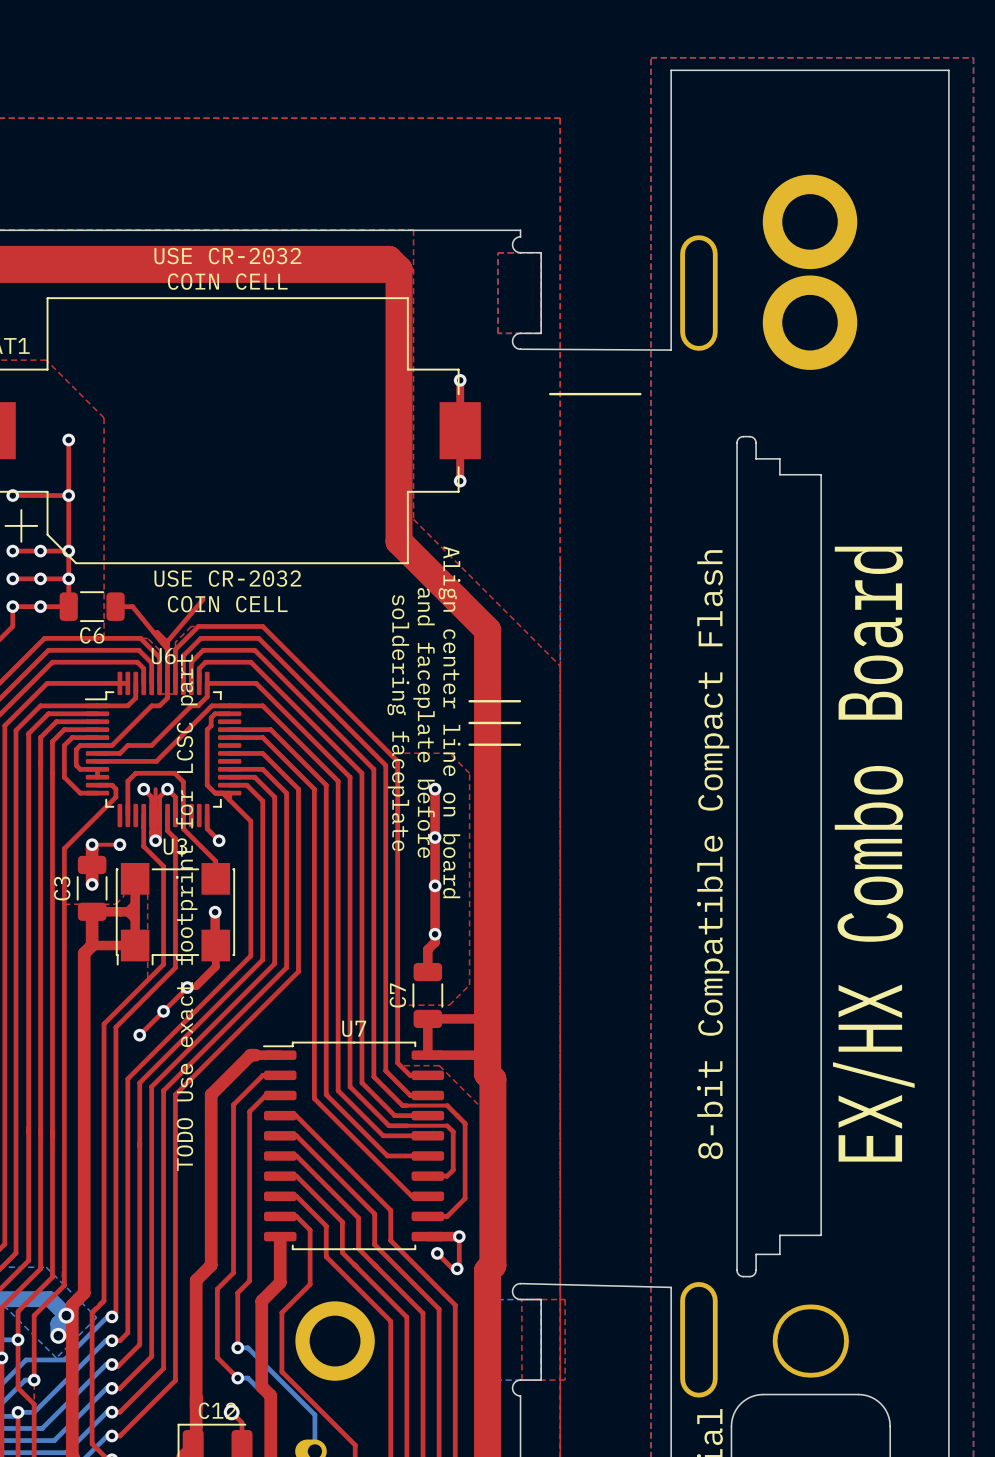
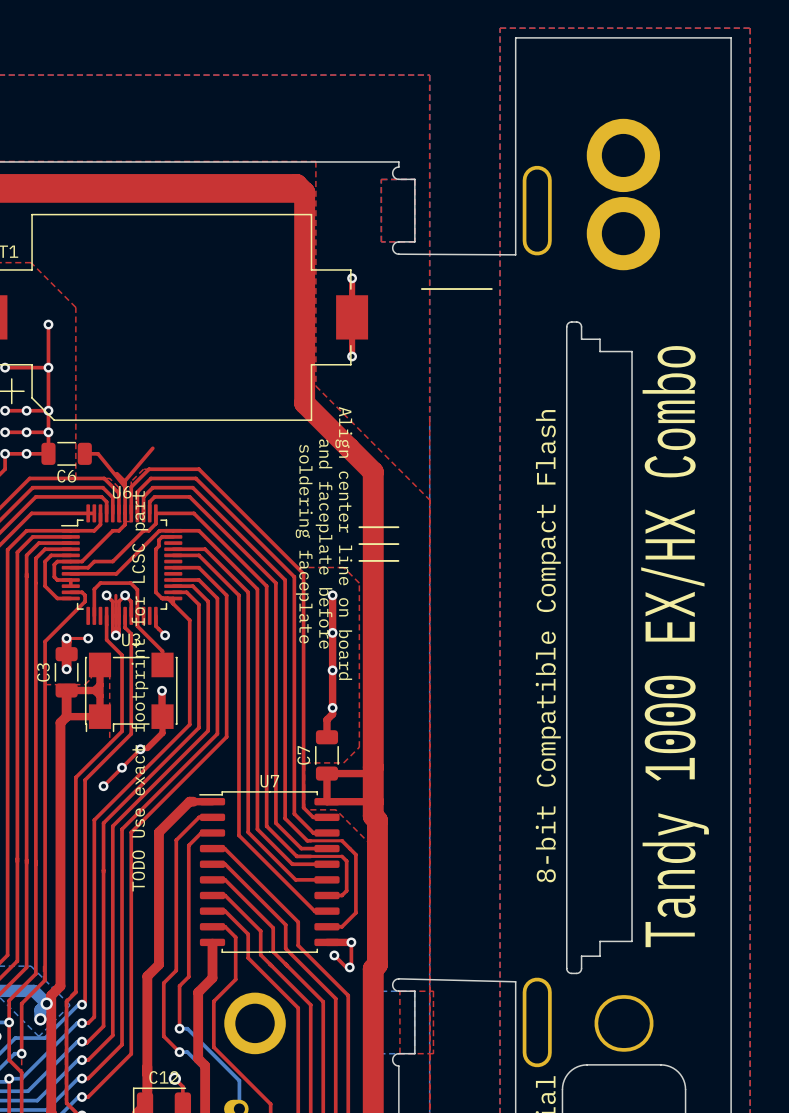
text: USE CR-2032 (227, 256) -> none
text: COIN CELL (227, 281) -> none
text: USE CR-2032 (227, 578) -> none
text: COIN CELL (227, 604) -> none
text: EX/HX Combo Board (873, 854) -> Tandy 1000 EX/HX Combo (675, 646)

